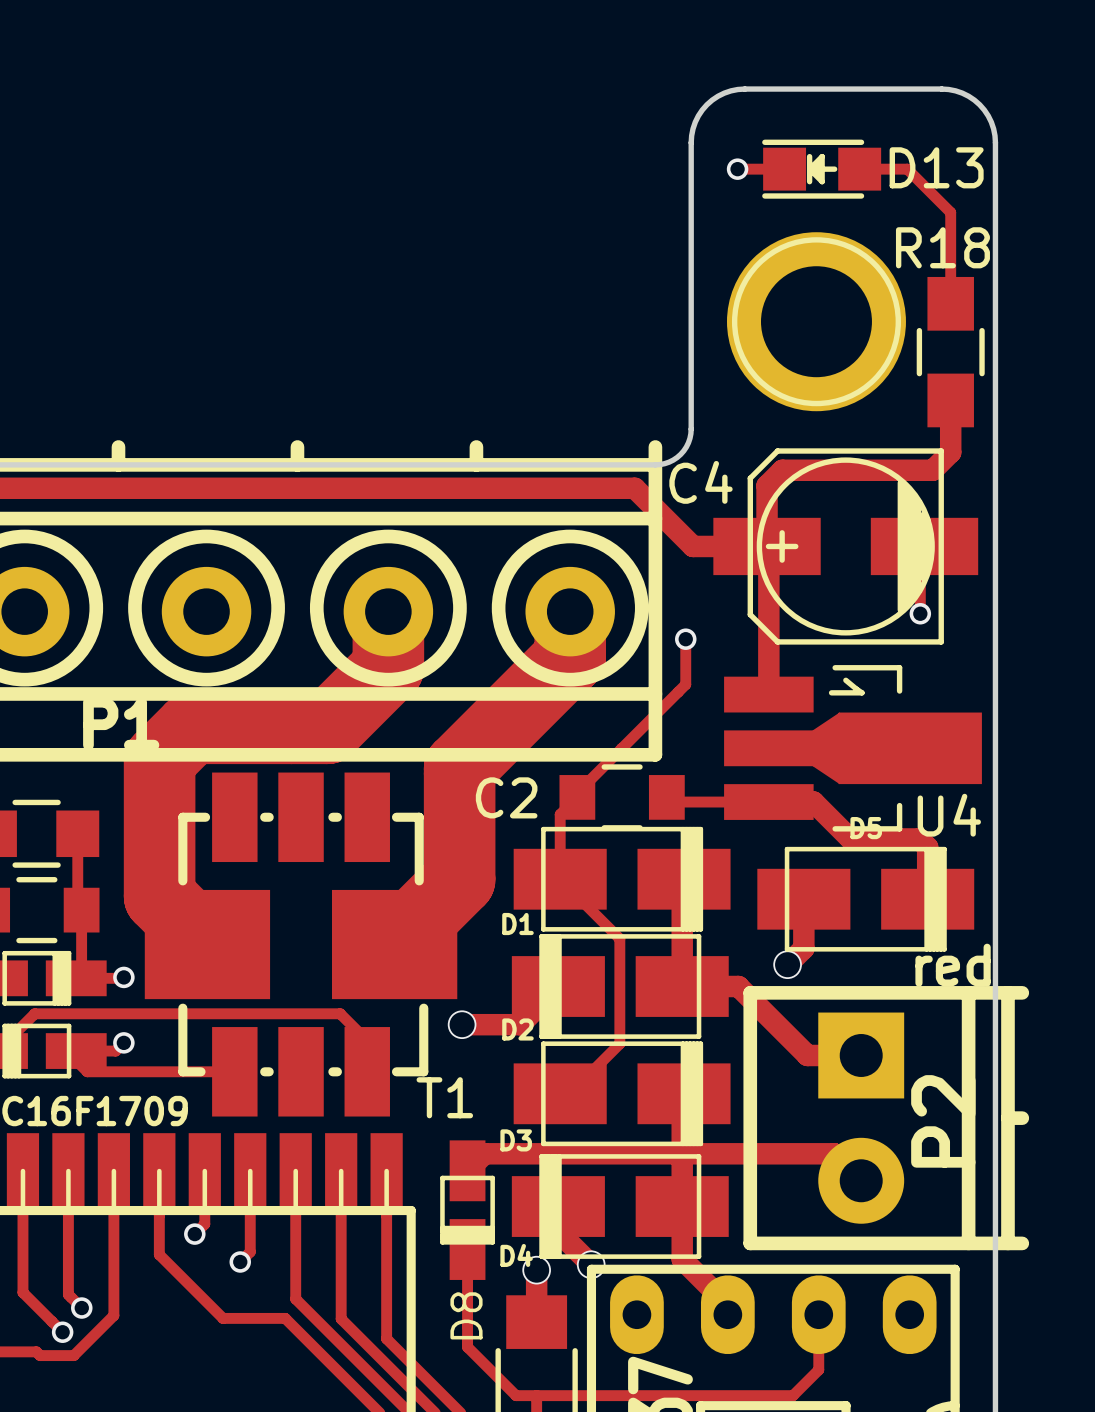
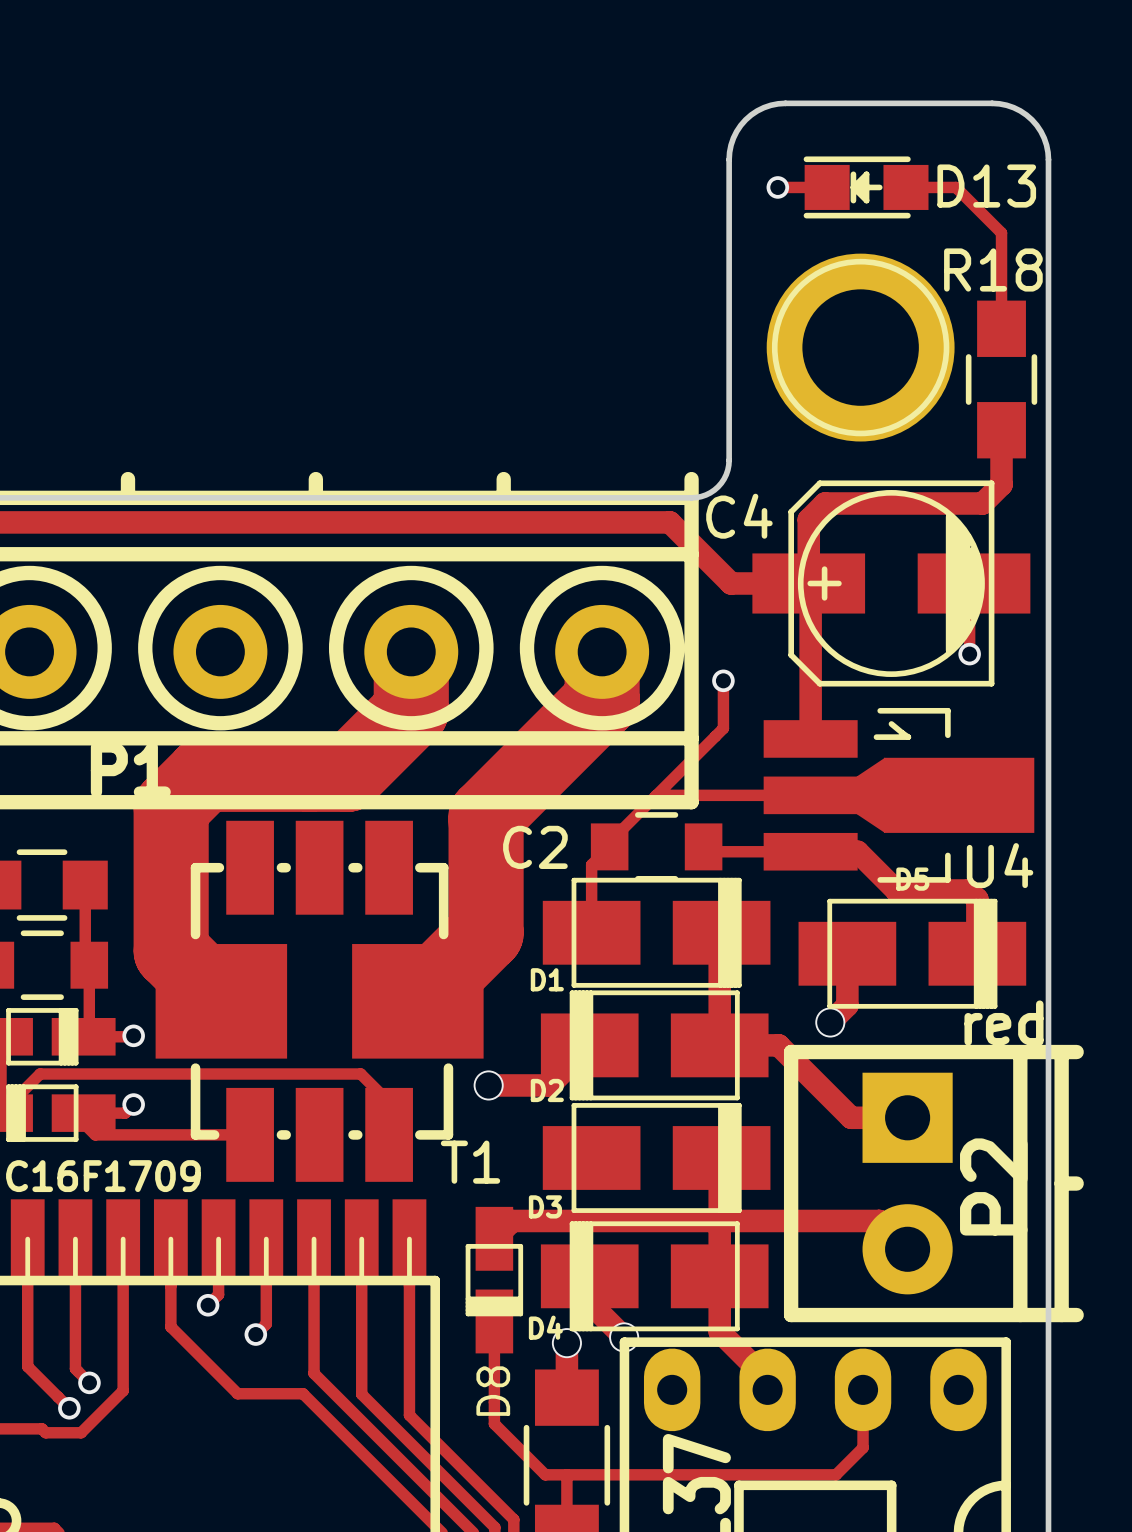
track: none -> (656, 795) (810, 795)
track: (550, 879) (560, 879) (619, 938) (619, 1043) (569, 1093) (560, 1093) -> none

